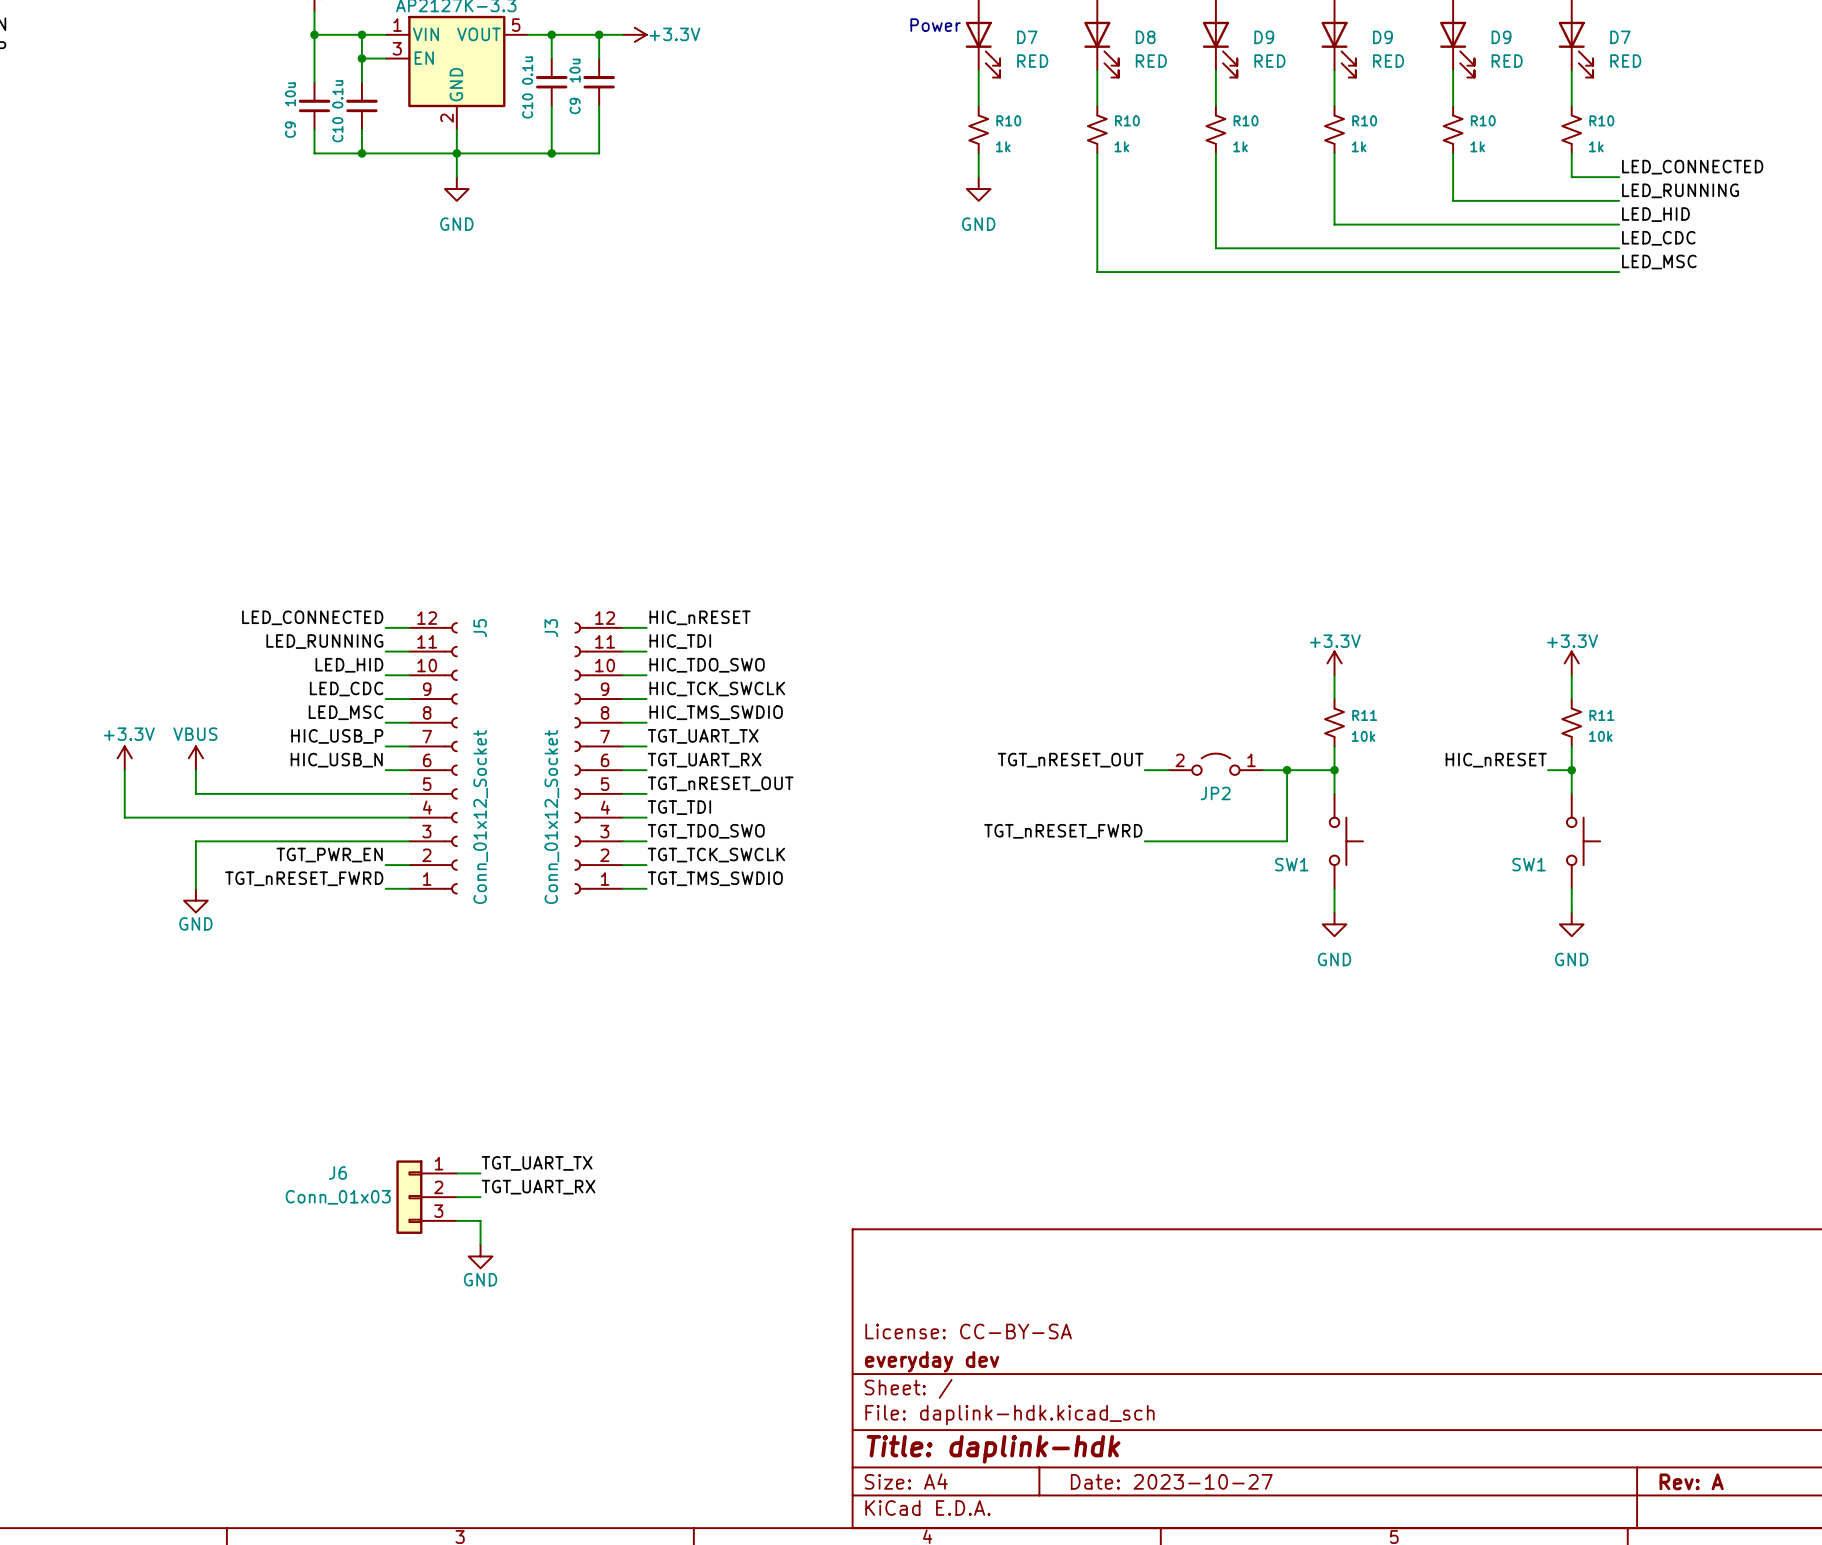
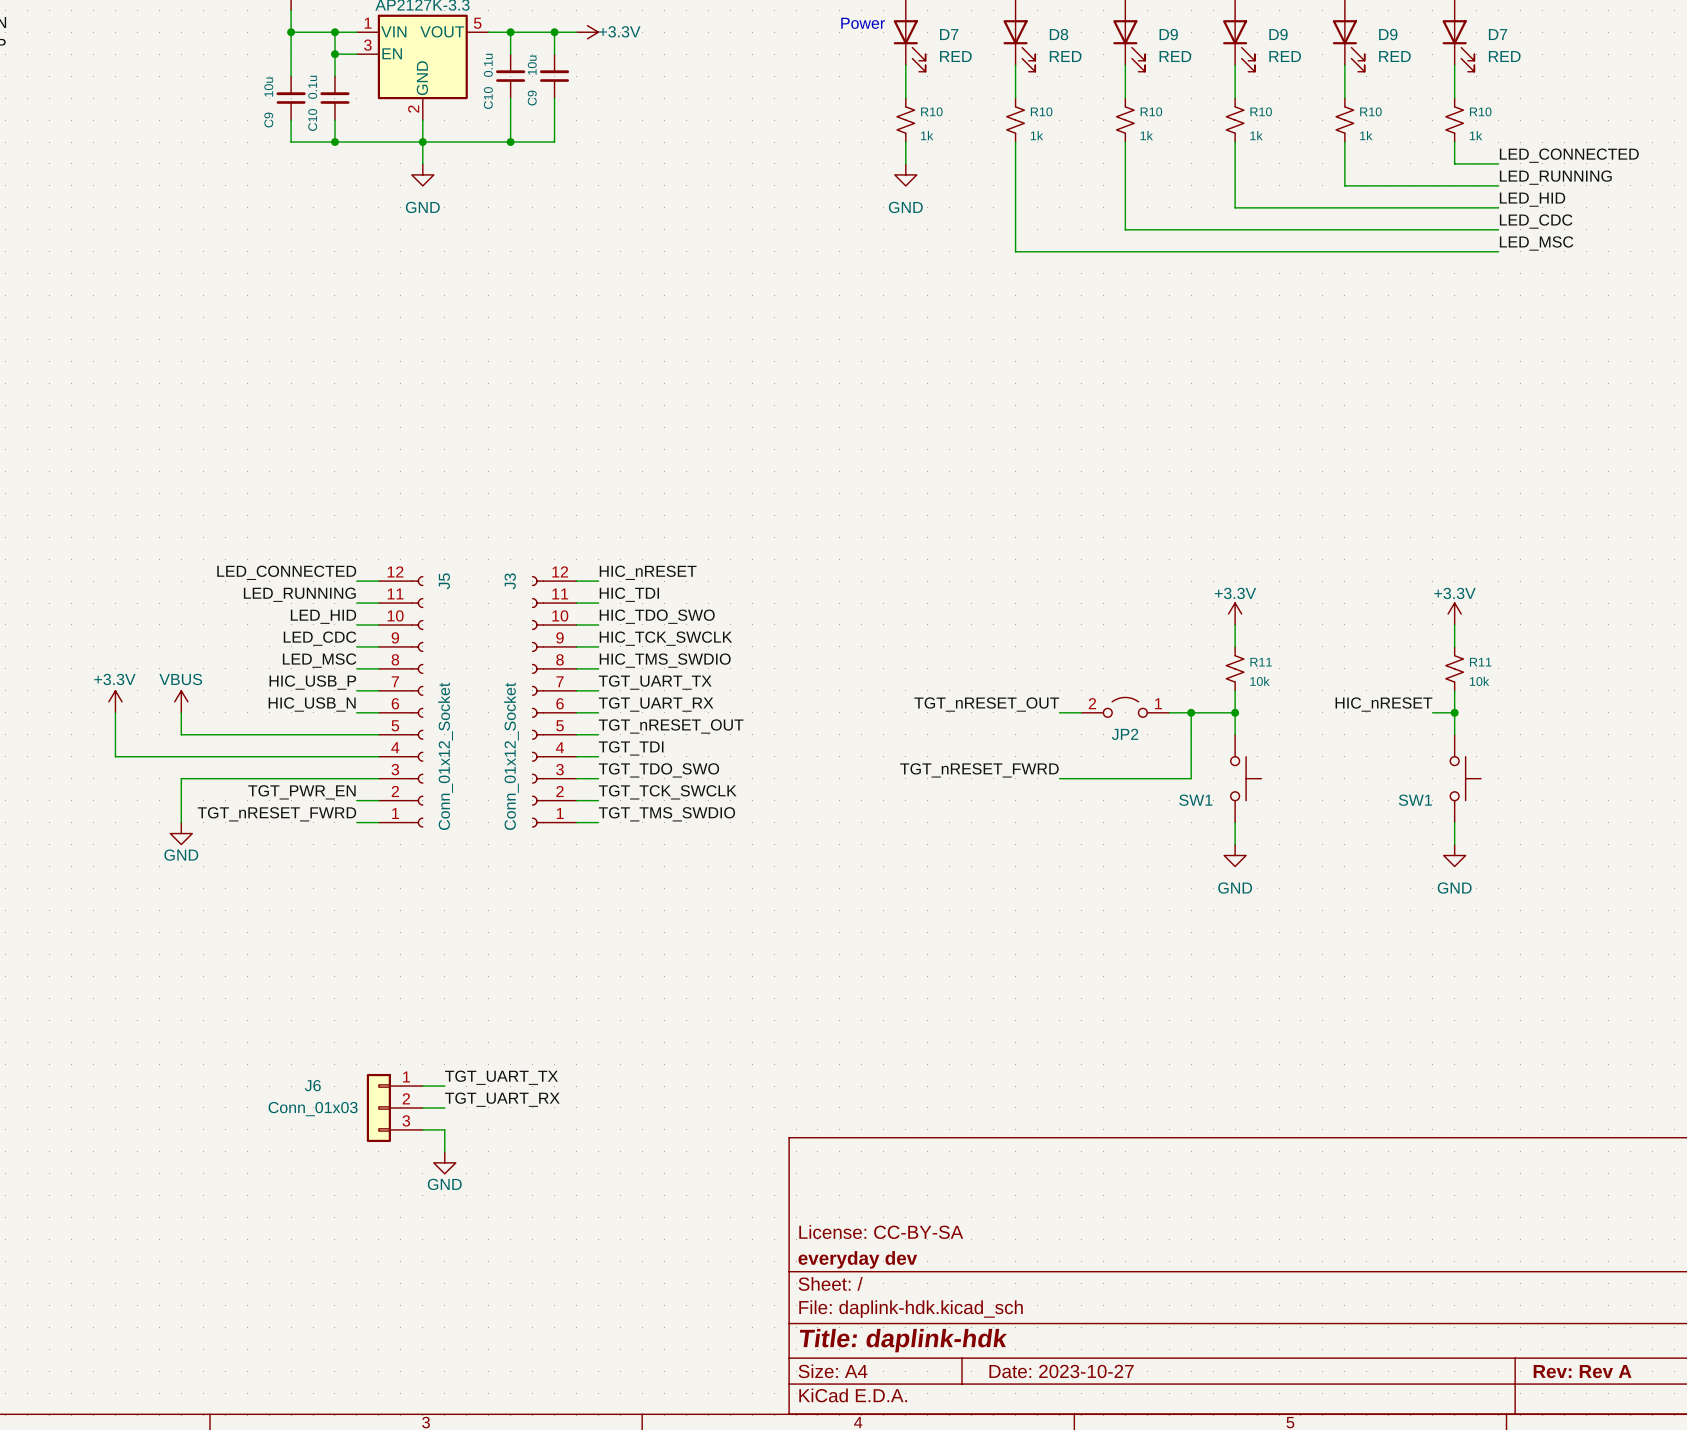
title block: Rev: A (1691, 1481) -> Rev: Rev A (1582, 1371)

